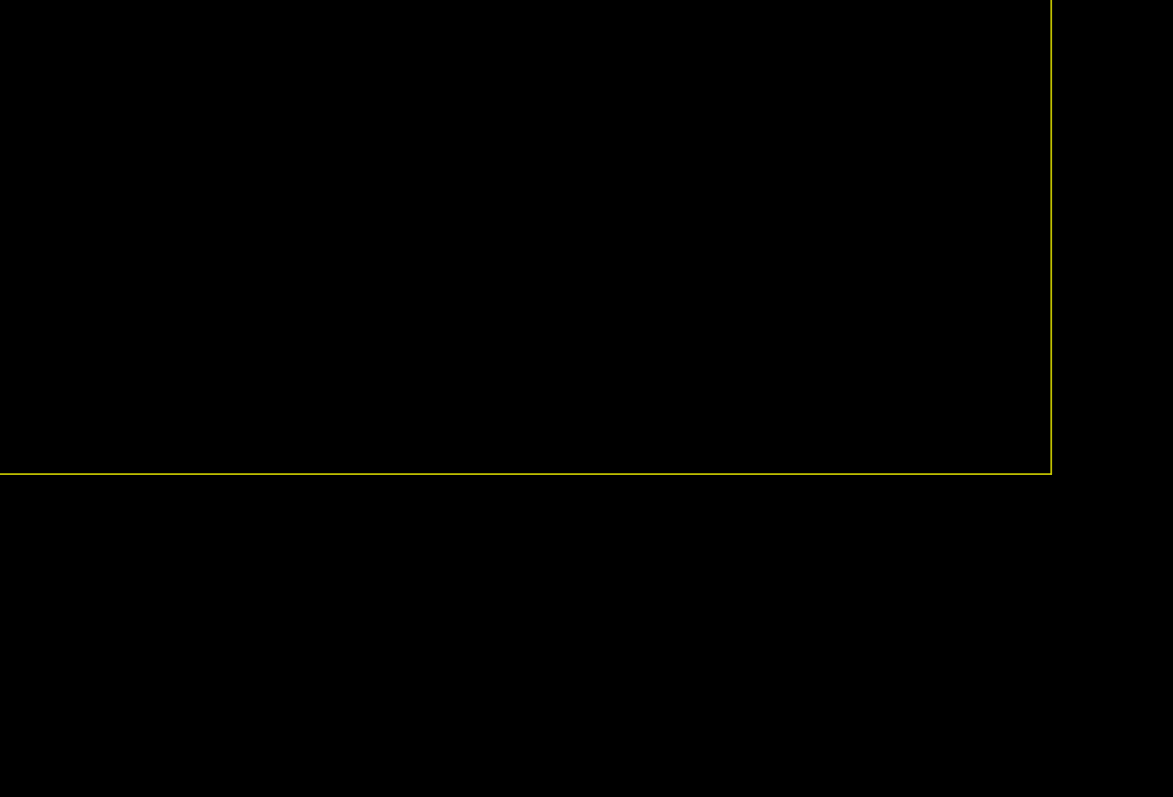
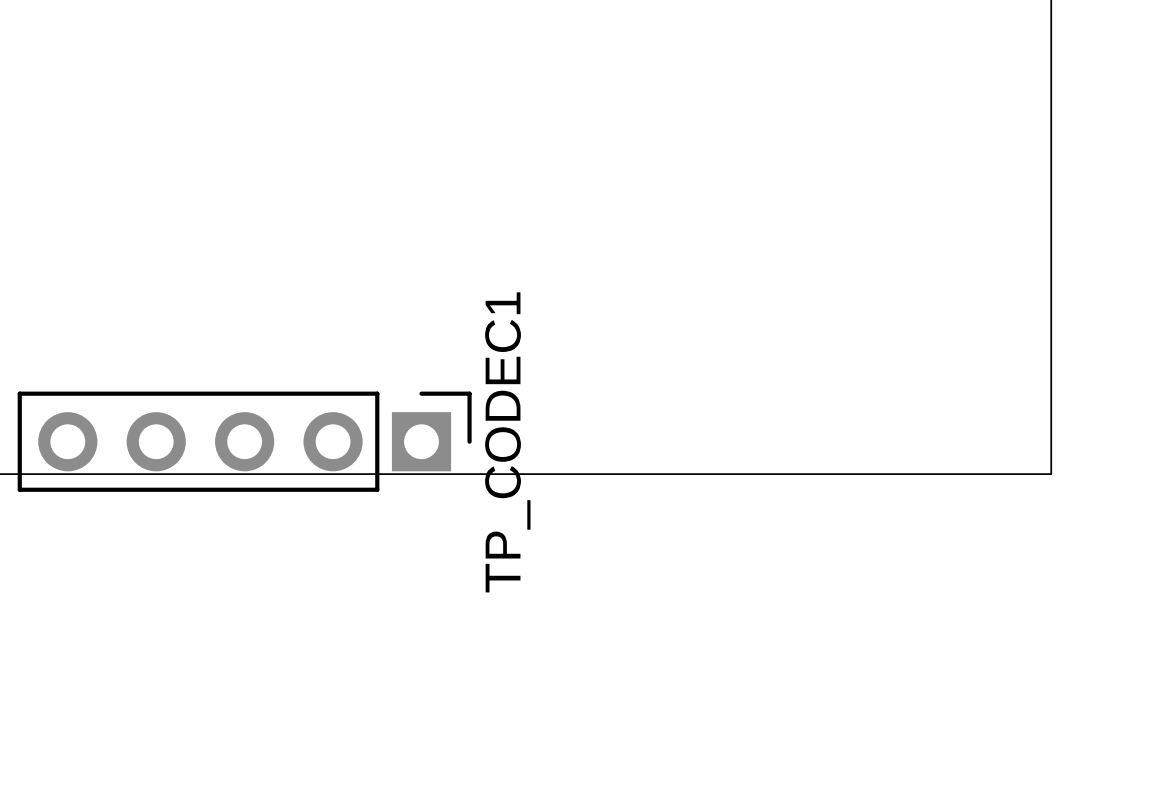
TP_CODEC1: none -> (244, 441)

